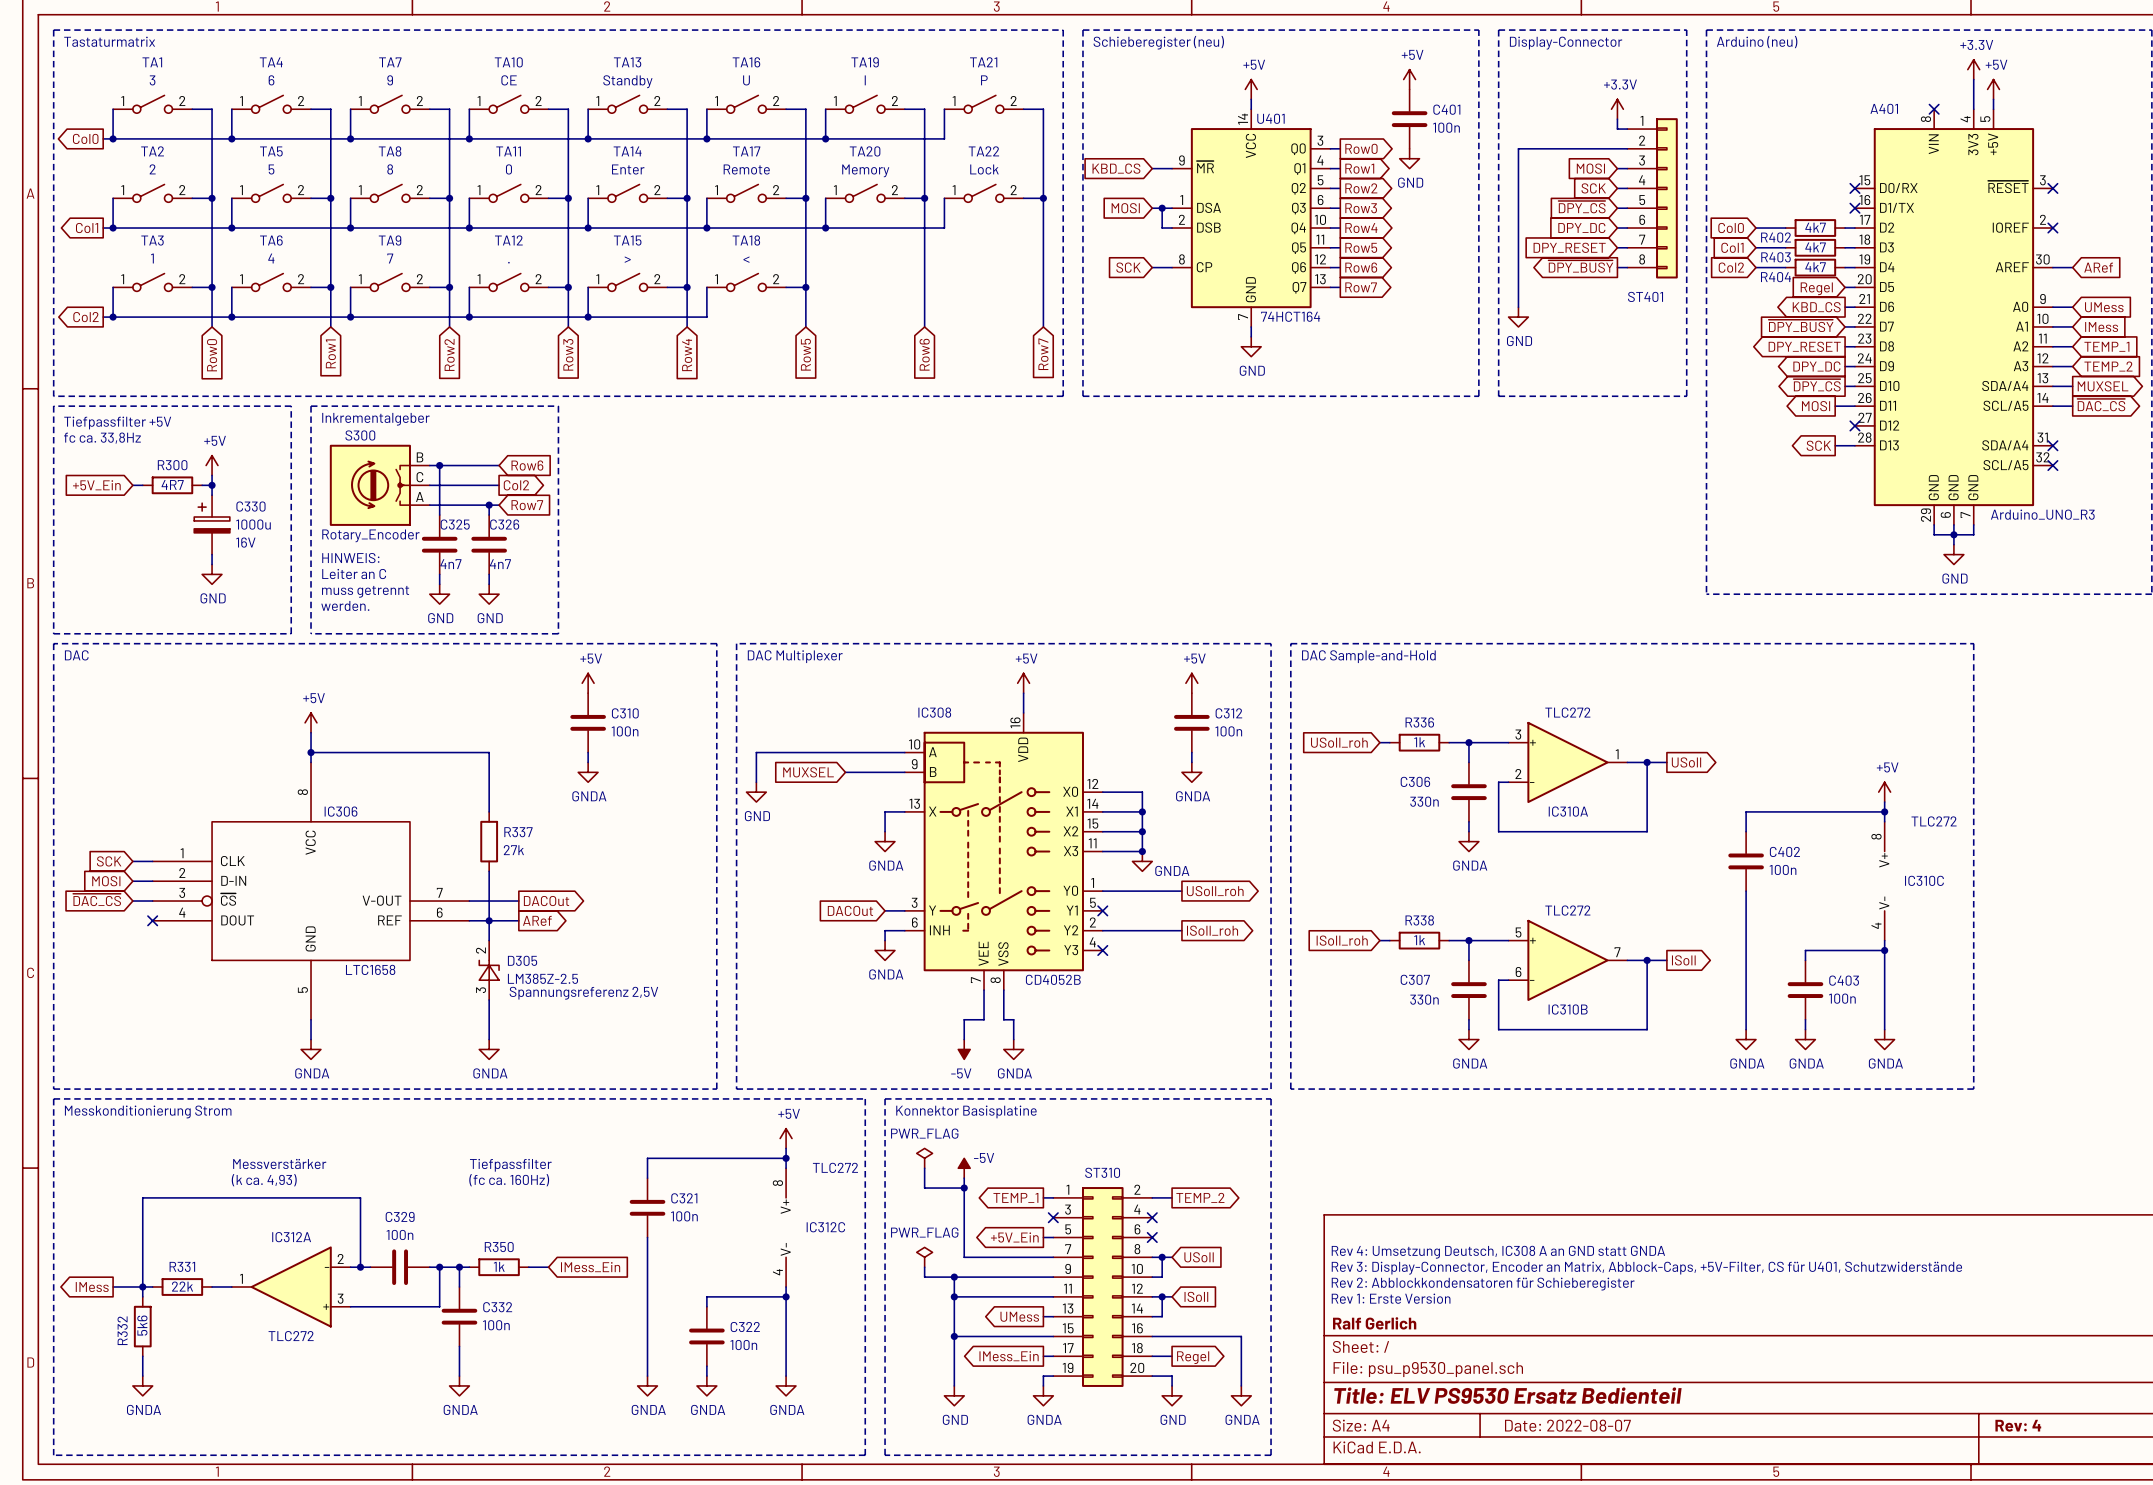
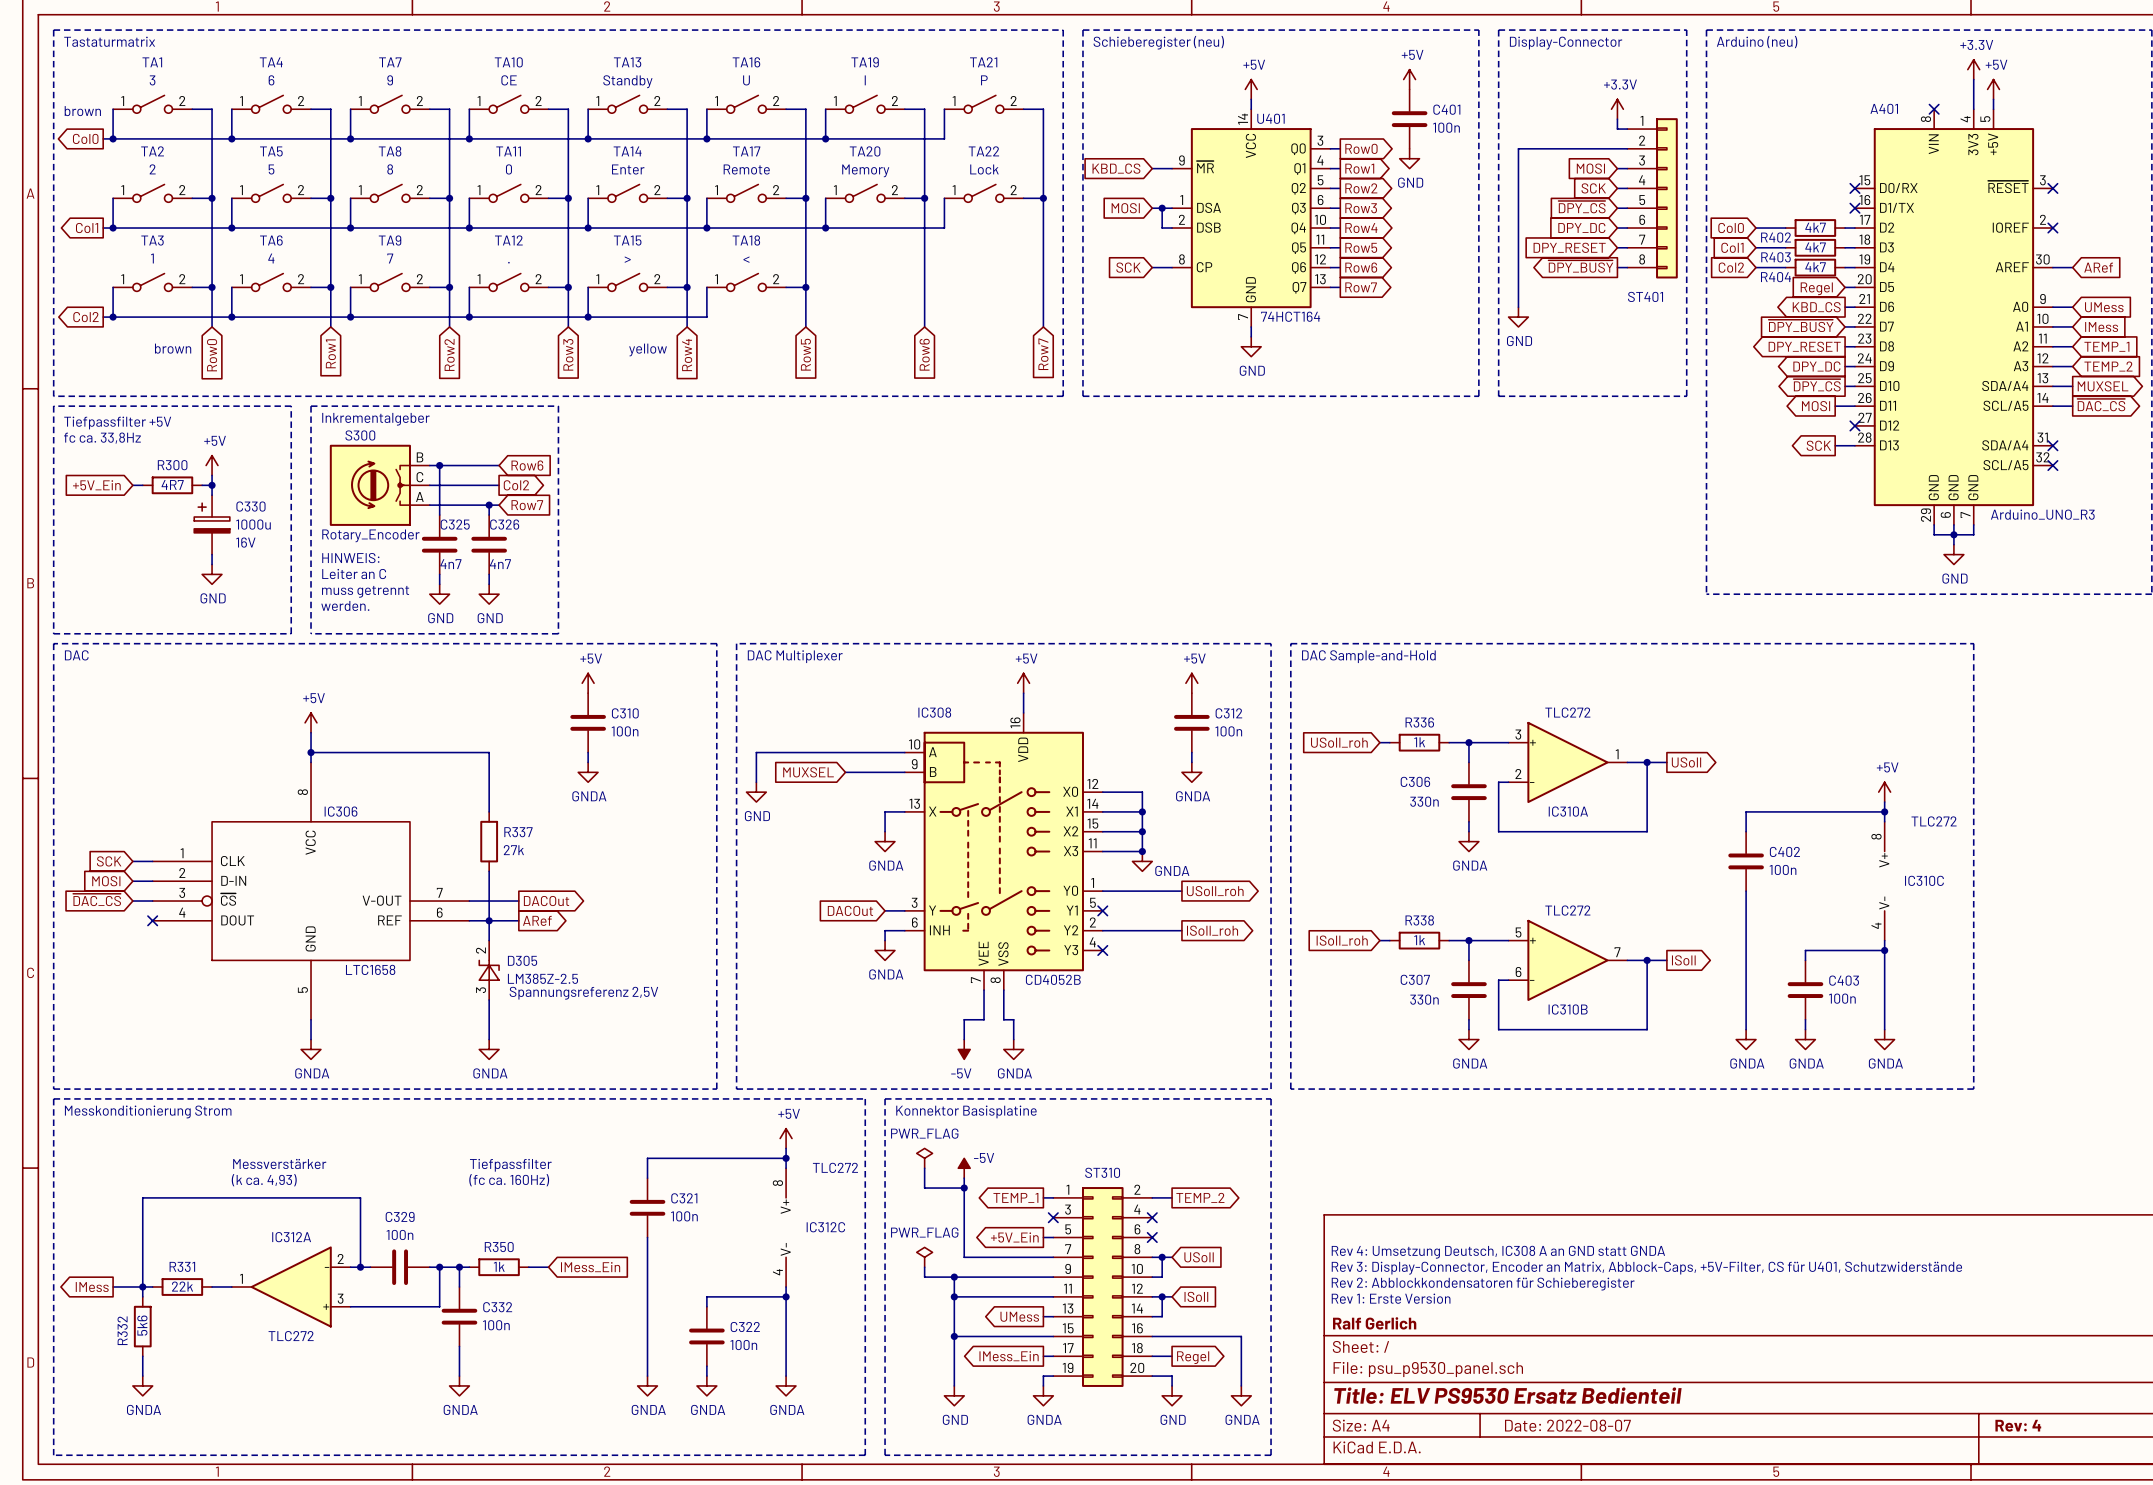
text: none -> brown (82, 111)
text: none -> brown (173, 348)
text: none -> yellow (648, 349)

